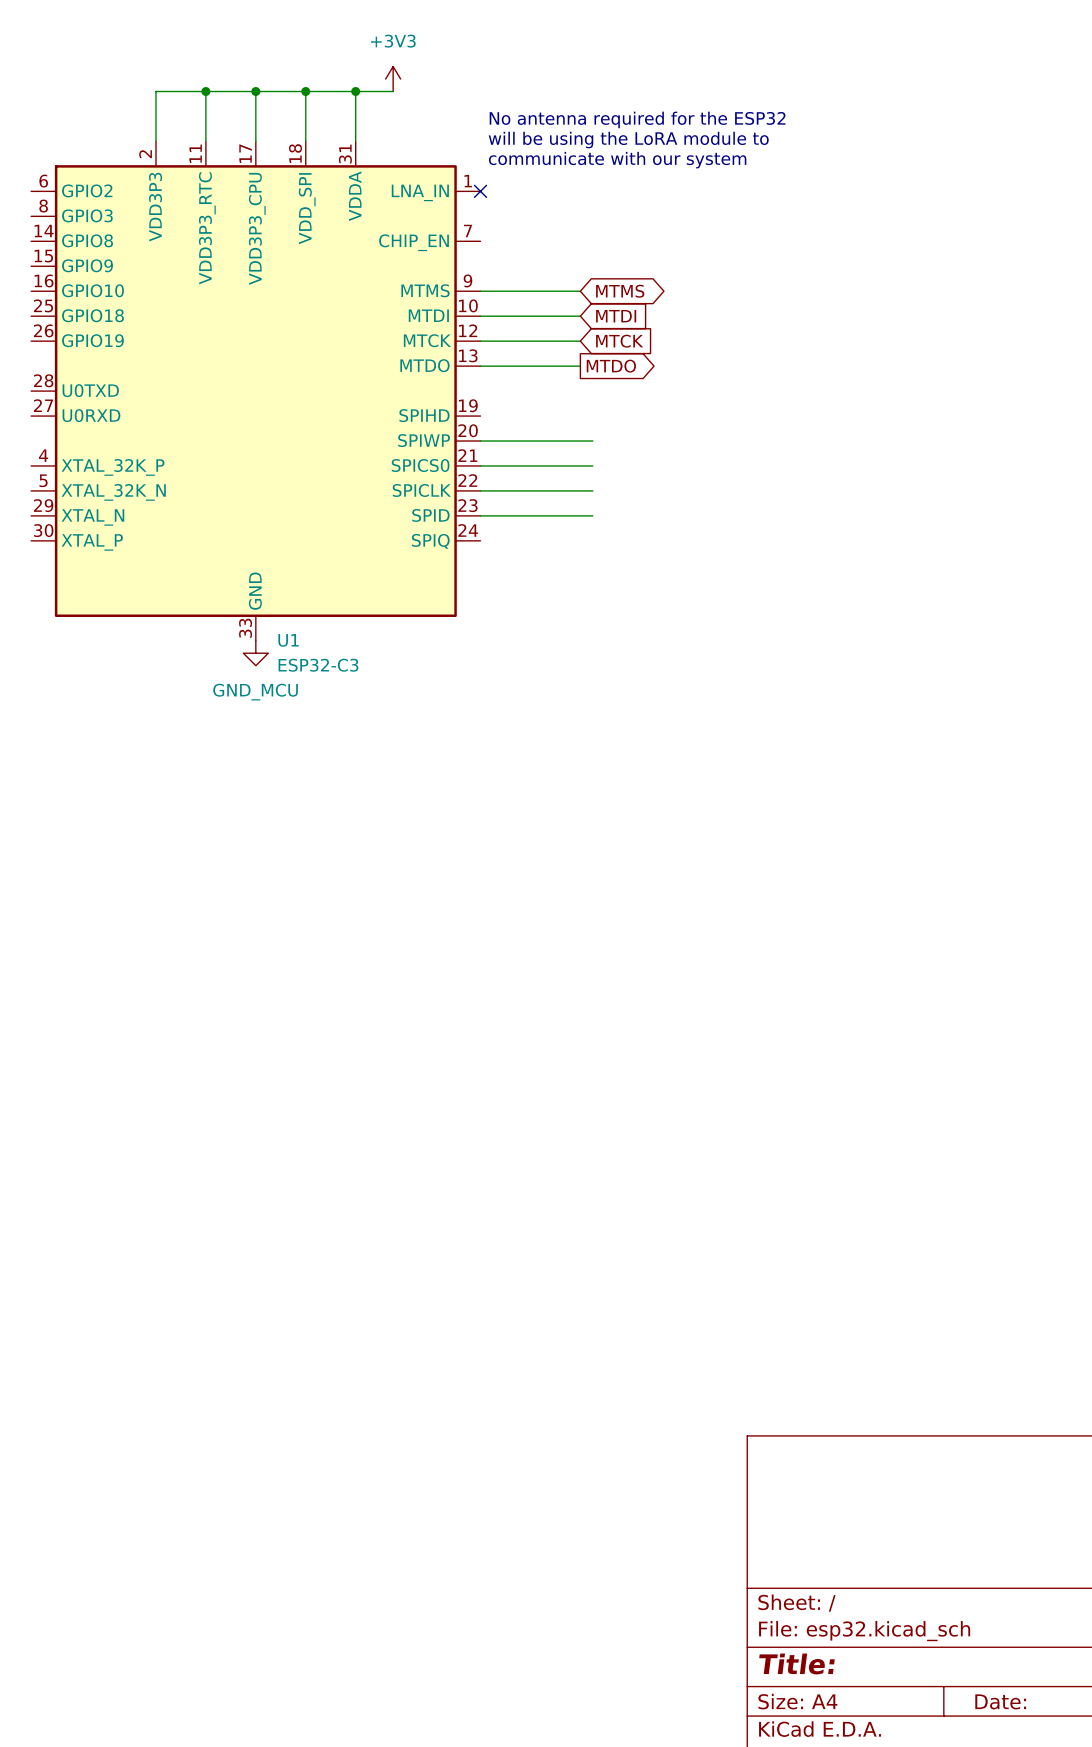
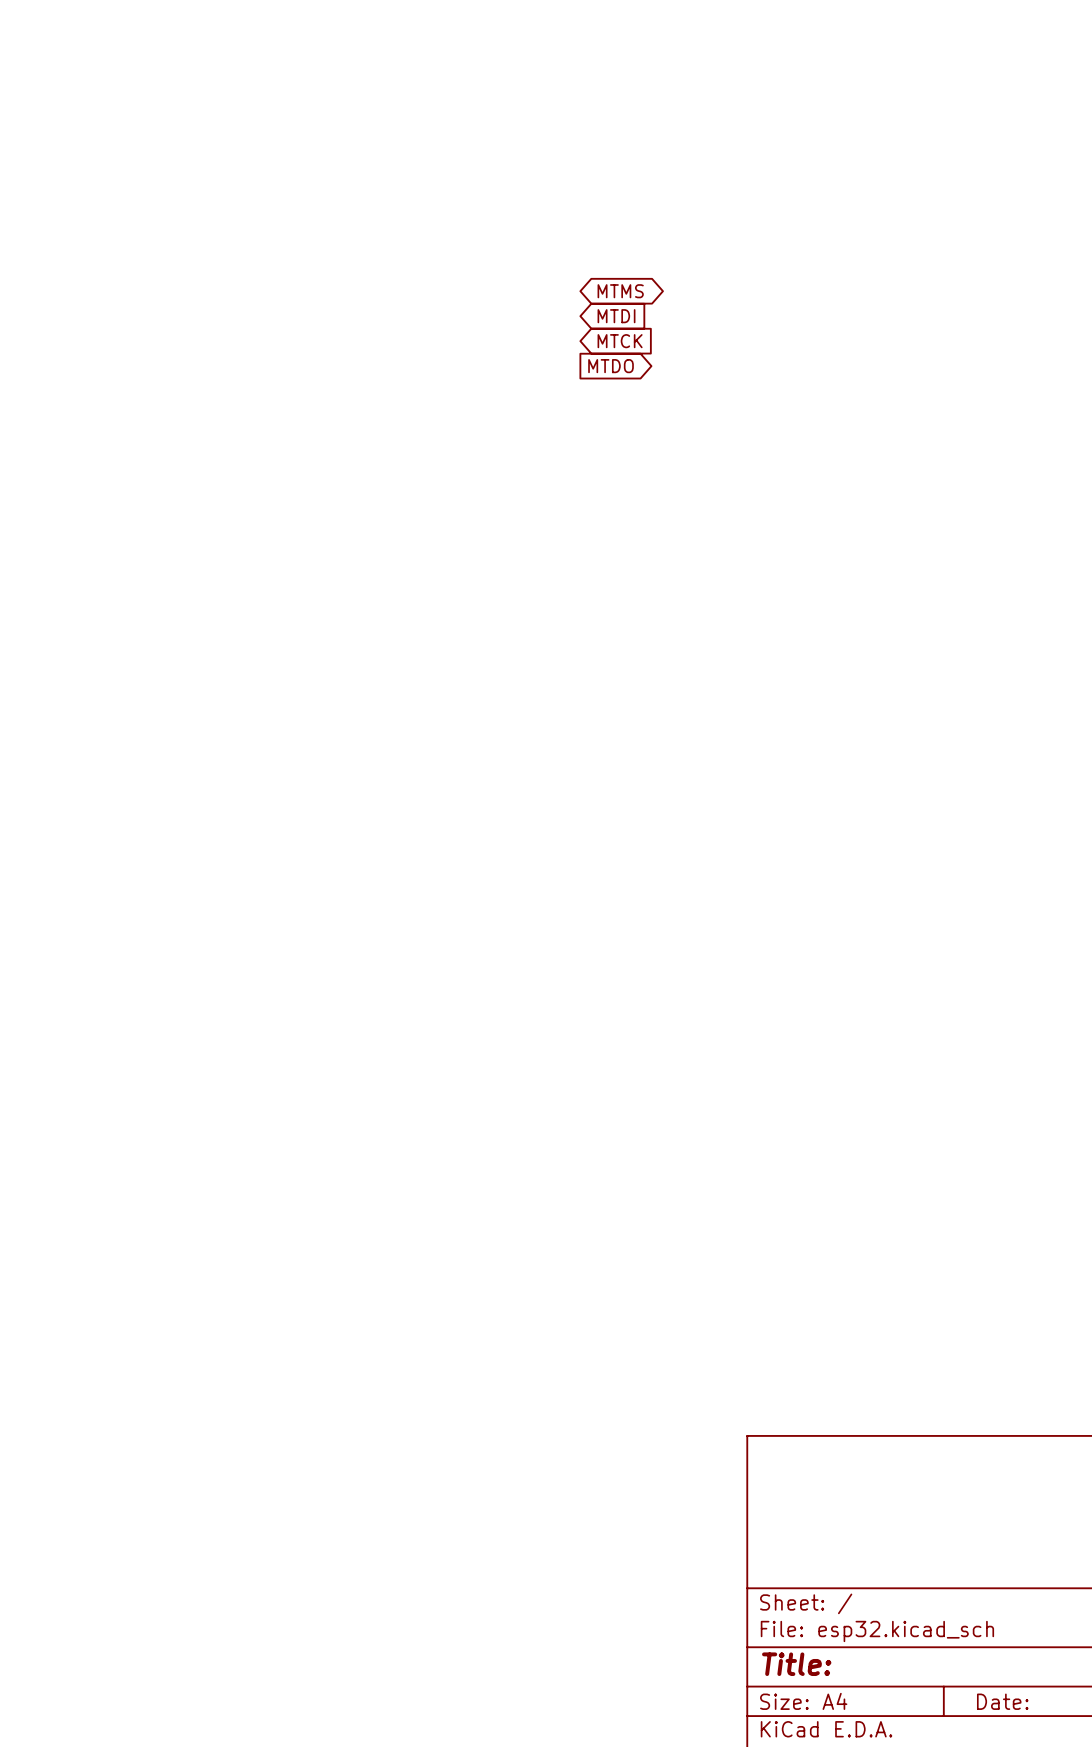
power symbol: +3V3 (393, 79) -> none
wire: (205, 91) (205, 141) -> none
junction: (205, 91) -> none
wire: (255, 91) (255, 141) -> none
junction: (255, 91) -> none
wire: (305, 91) (305, 141) -> none
junction: (305, 91) -> none
wire: (355, 91) (355, 141) -> none
junction: (355, 91) -> none
wire: (393, 91) (155, 91) (155, 141) -> none
text: No antenna required for the ESP32 (637, 119) -> none
text: will be using the LoRA module to (628, 140) -> none
text: communicate with our system (617, 160) -> none
no-connect mark: (480, 191) -> none
wire: (480, 291) (580, 291) -> none
wire: (480, 316) (580, 316) -> none
wire: (480, 341) (580, 341) -> none
wire: (480, 366) (580, 366) -> none
U1: ESP32-C3 (255, 391) -> none
wire: (480, 441) (592, 441) -> none
wire: (480, 465) (592, 465) -> none
wire: (480, 490) (592, 490) -> none
wire: (480, 515) (592, 515) -> none
power symbol: GND_MCU (255, 653) -> none

